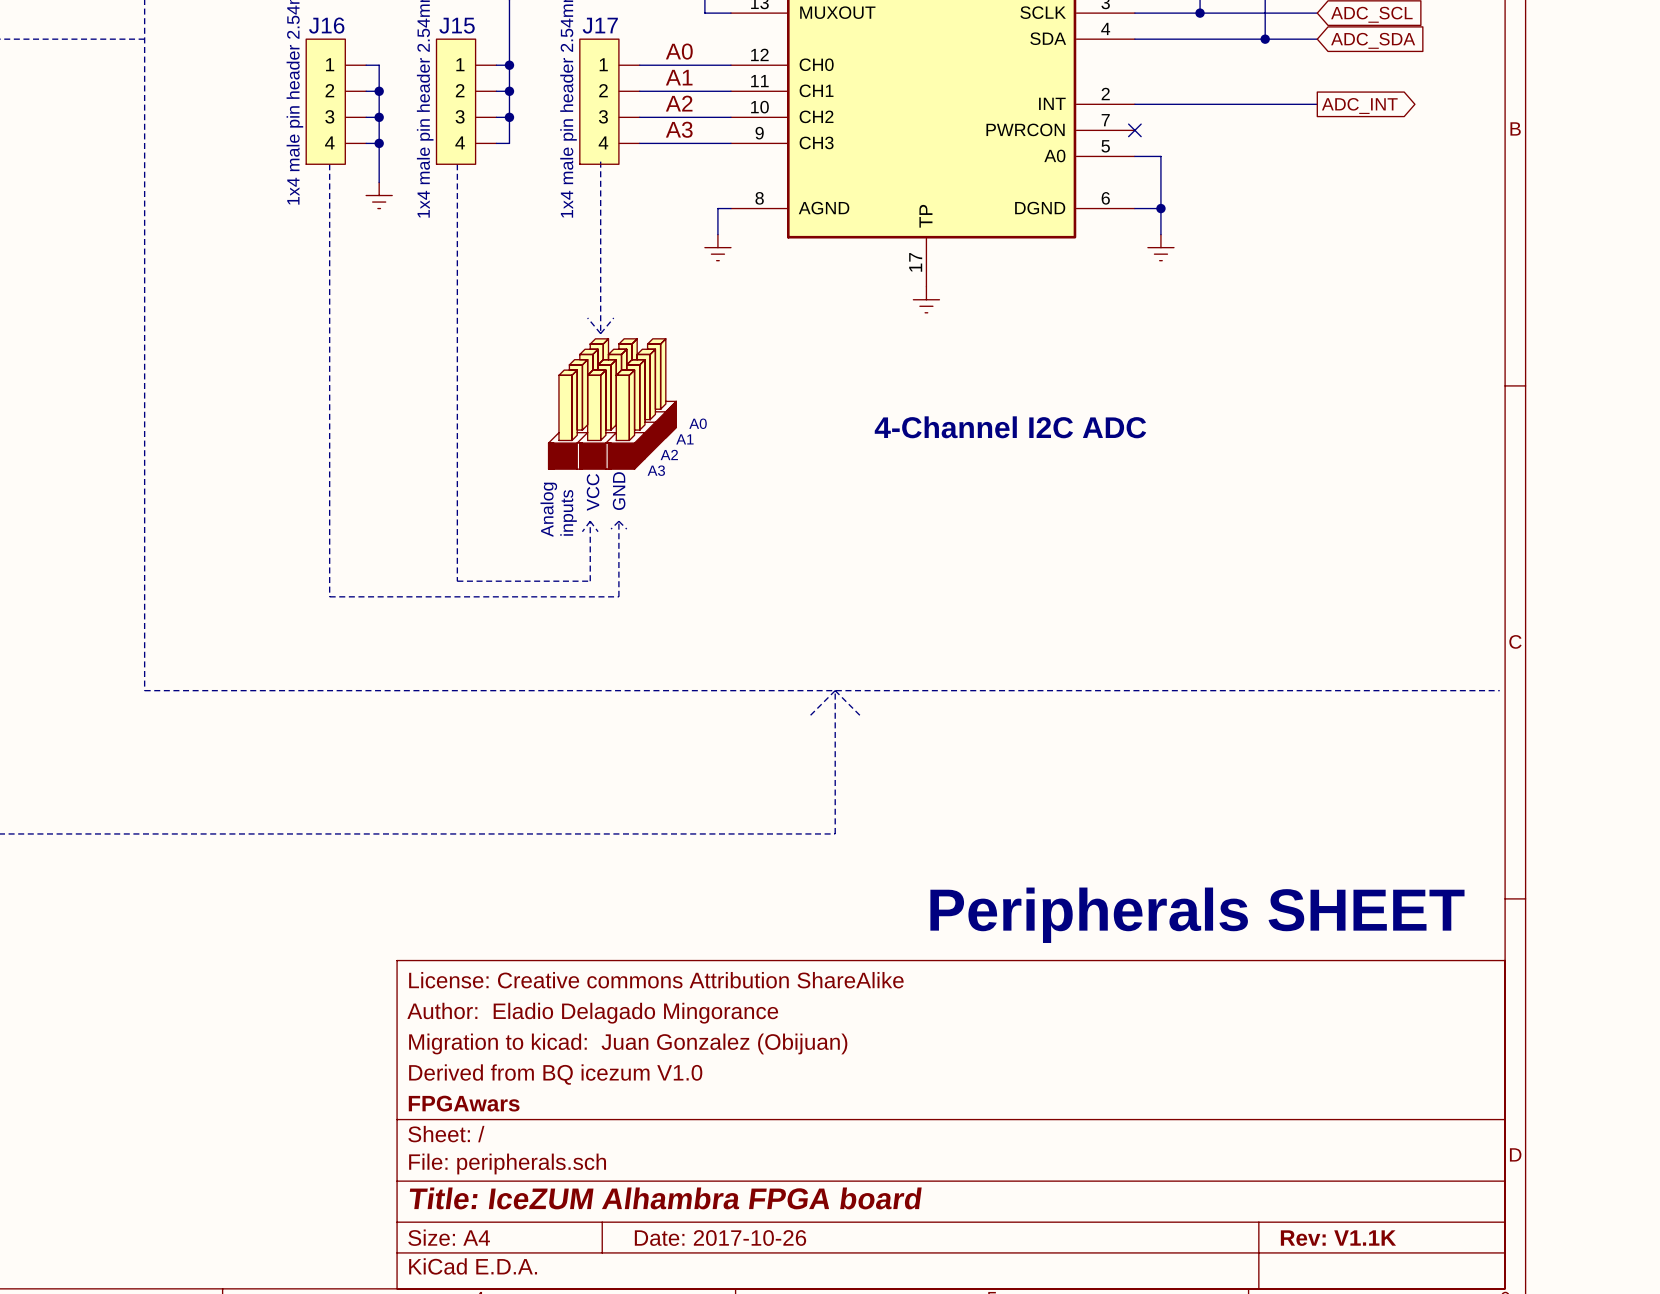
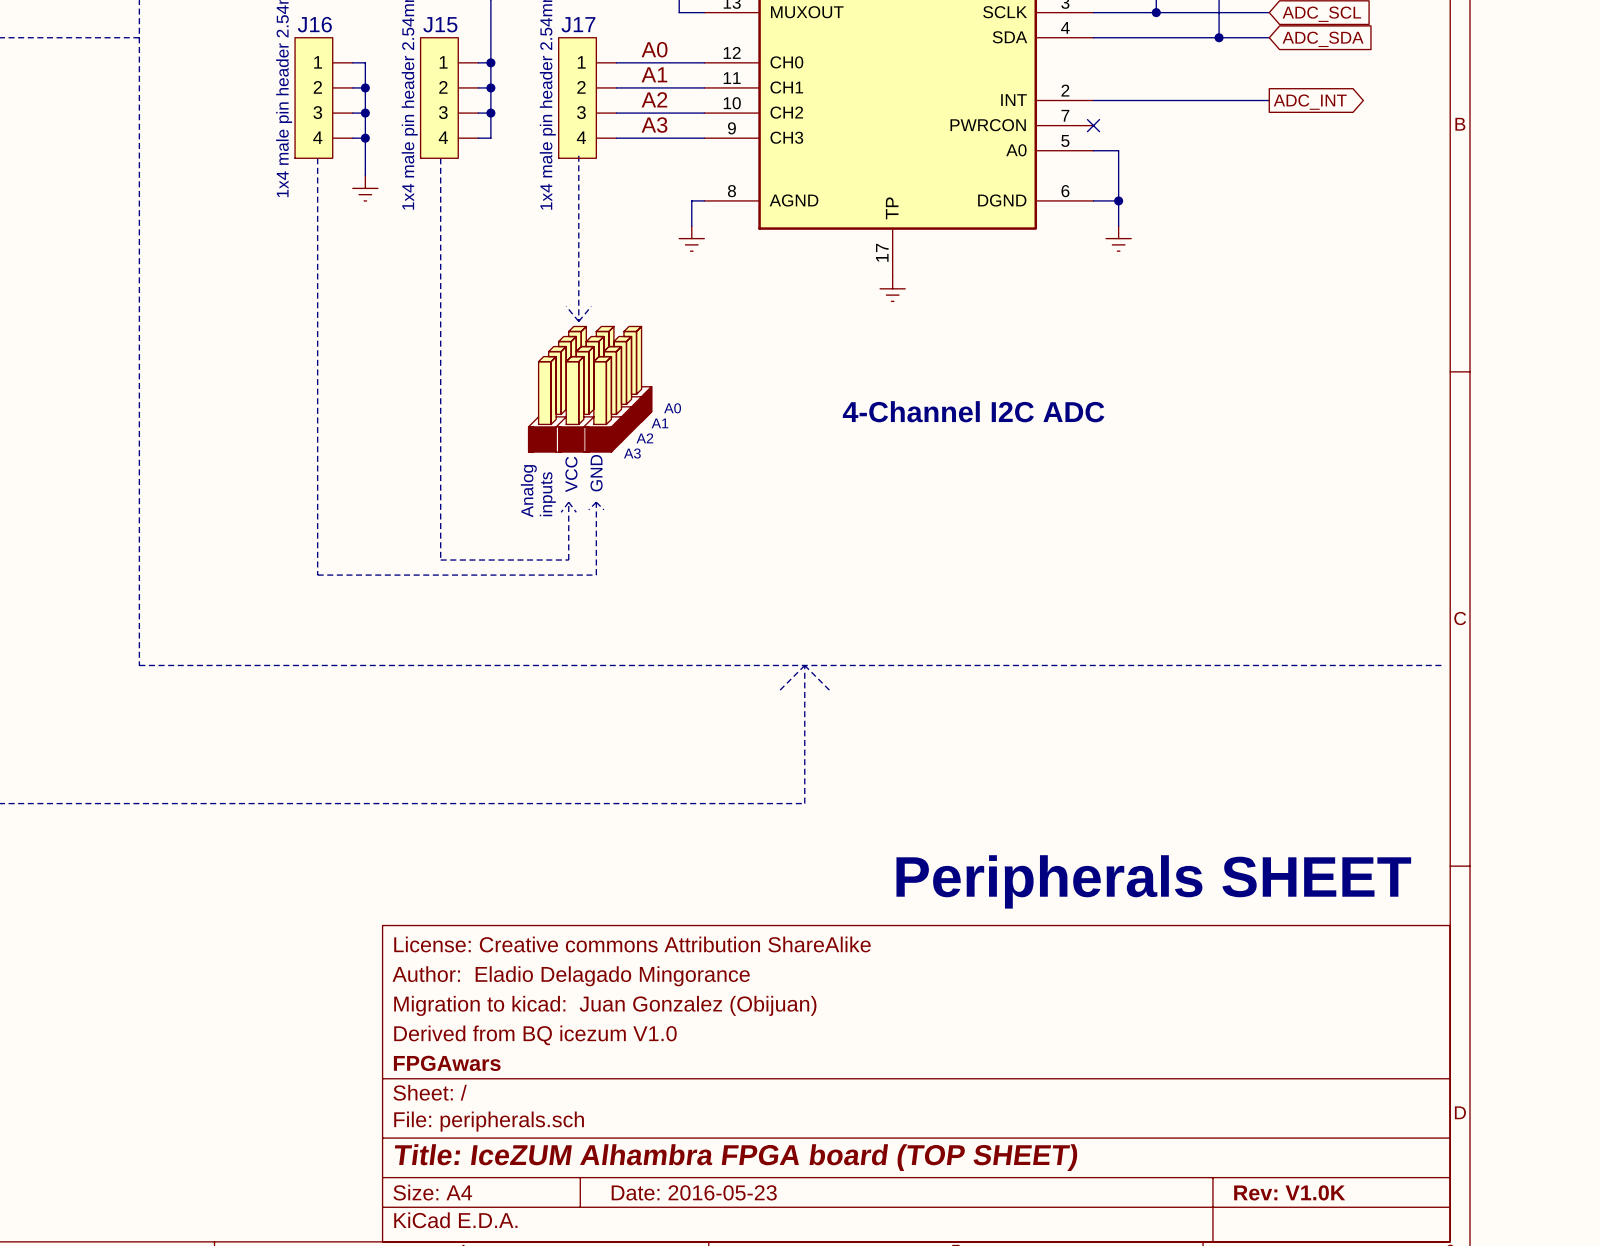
title block: Title: IceZUM Alhambra FPGA board (665, 1198) -> Title: IceZUM Alhambra FPGA board (TOP SHEET) (736, 1157)
title block: Date: 2017-10-26 (720, 1238) -> Date: 2016-05-23 (694, 1192)
title block: Rev: V1.1K (1338, 1238) -> Rev: V1.0K (1289, 1192)

